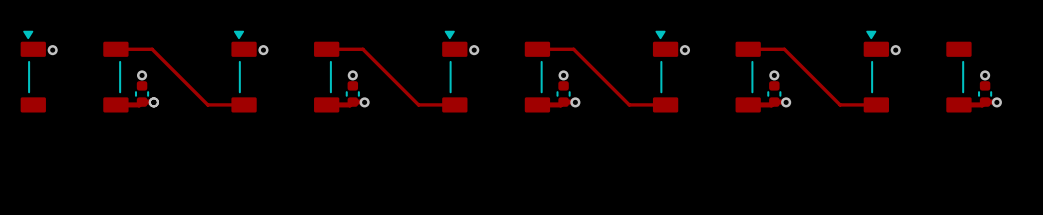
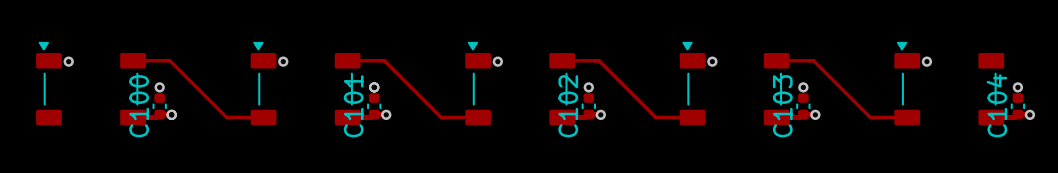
C100 name: none -> C100 (139, 106)
C101 name: none -> C101 (353, 106)
C102 name: none -> C102 (568, 106)
C103 name: none -> C103 (782, 106)
C104 name: none -> C104 (996, 105)

